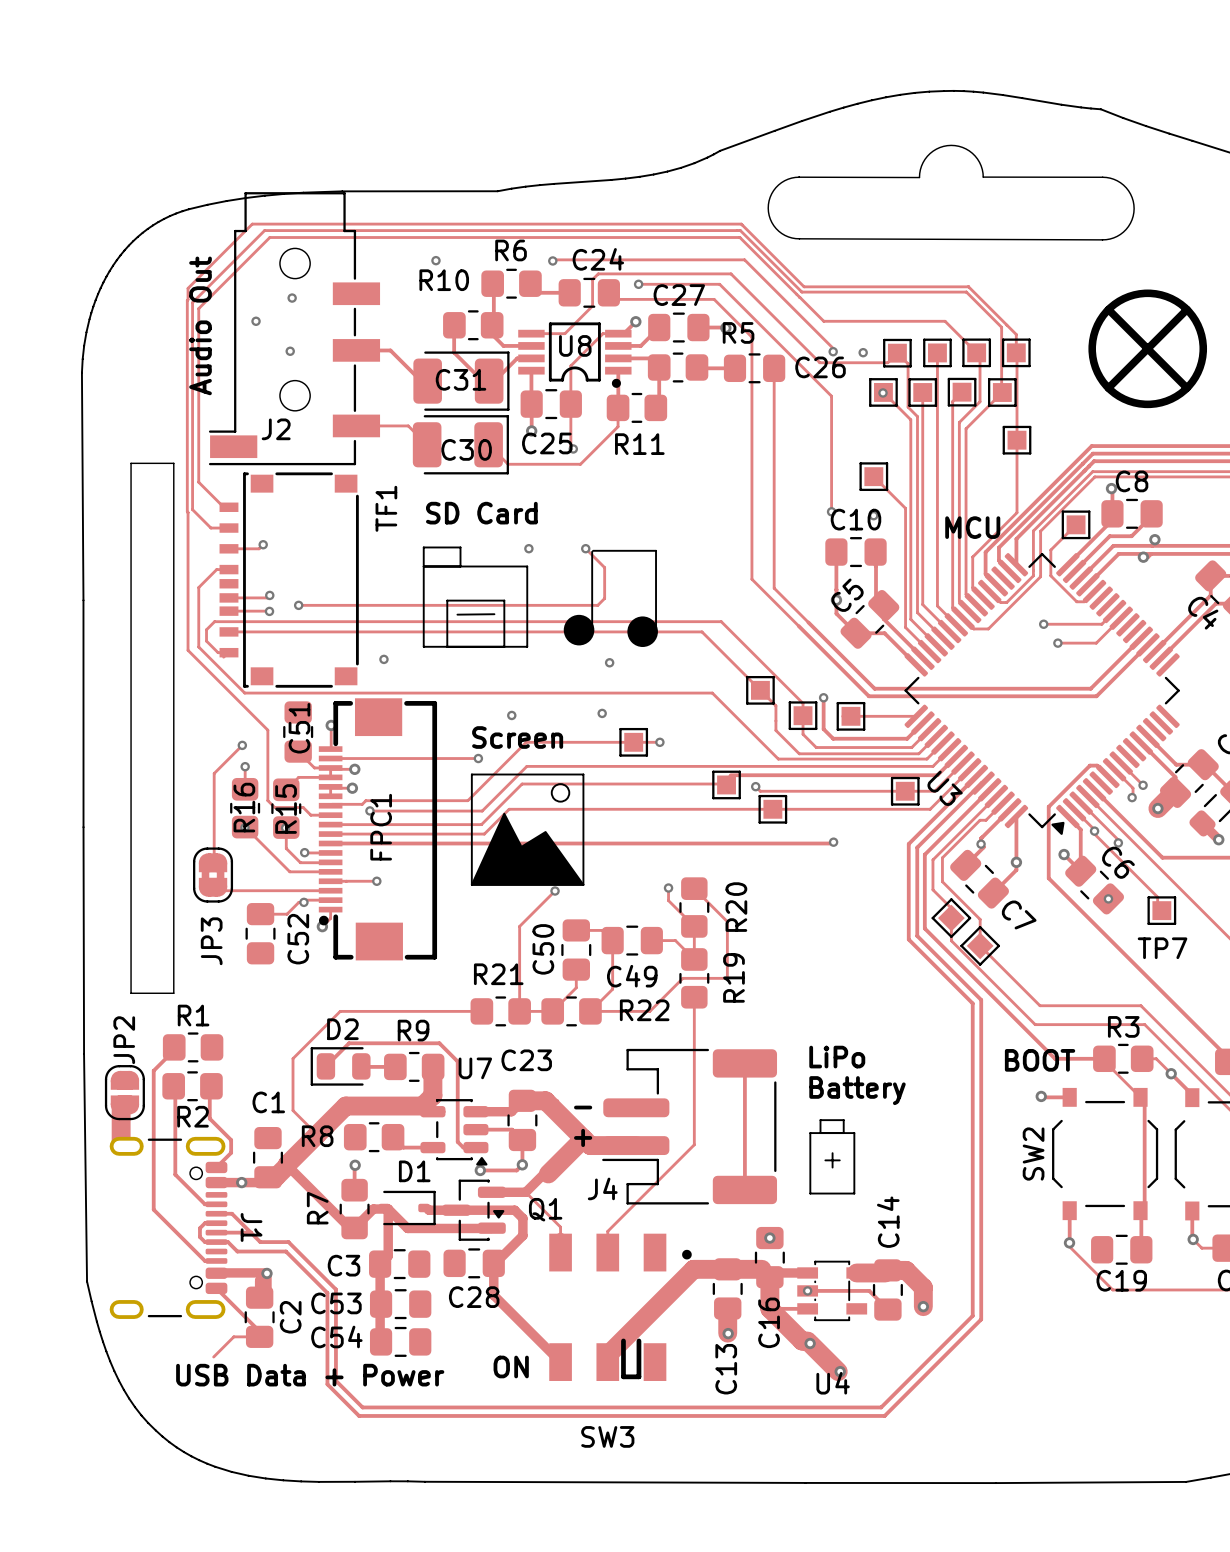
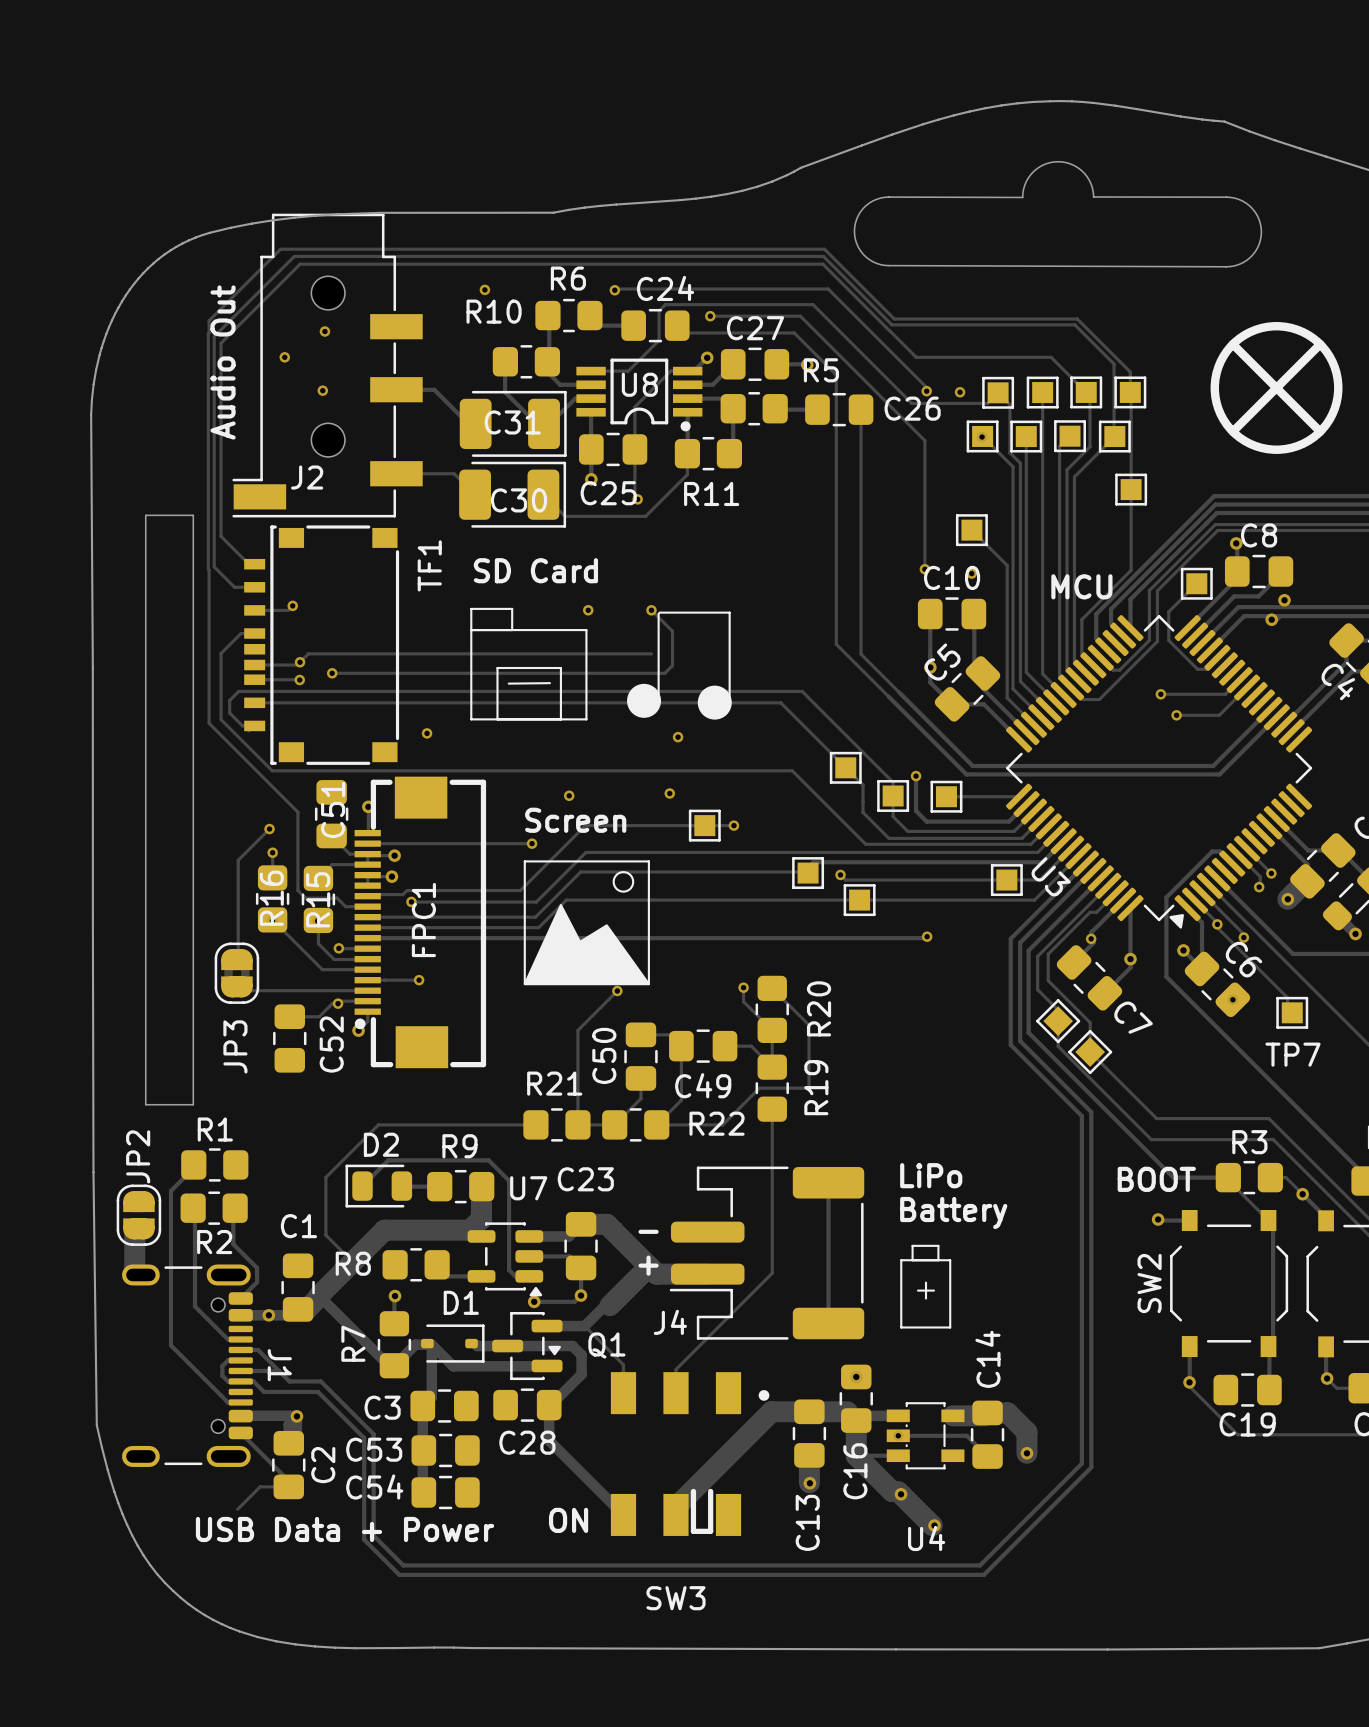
track: none -> (651, 653) (308, 653) (300, 662)

